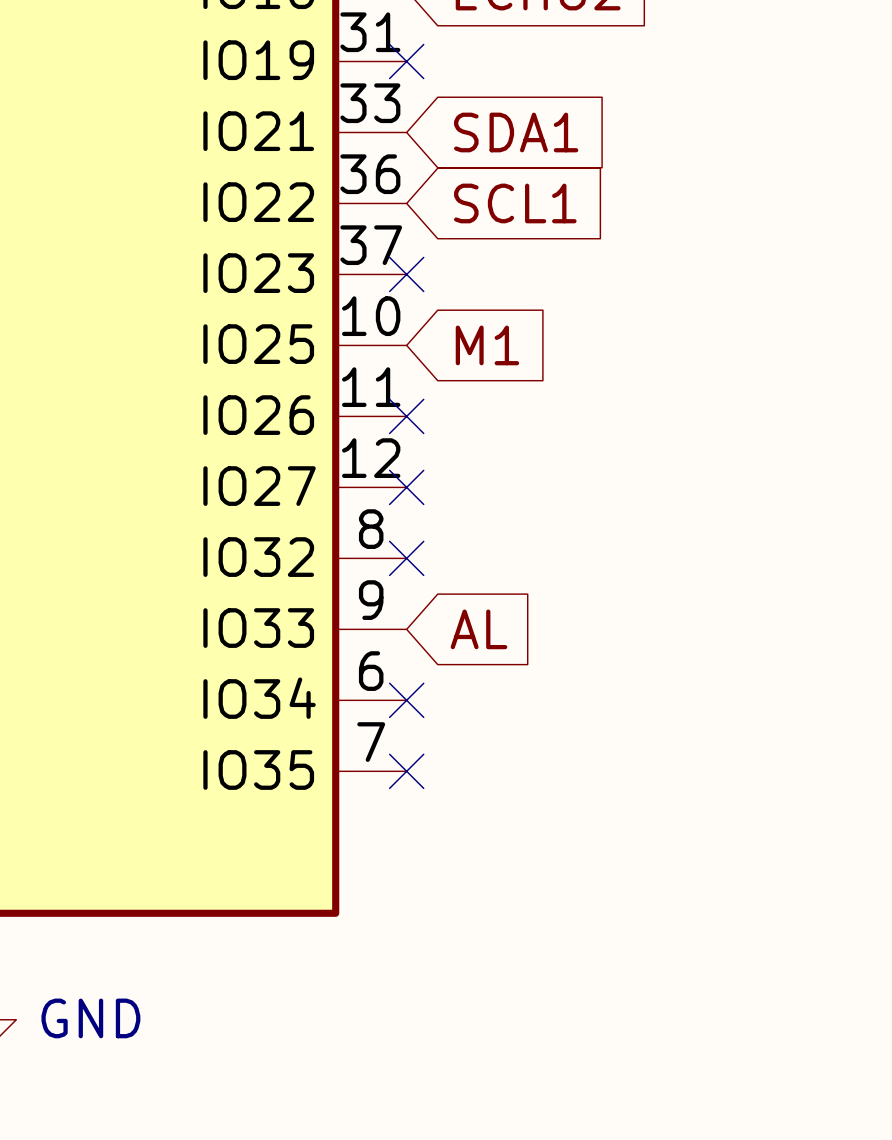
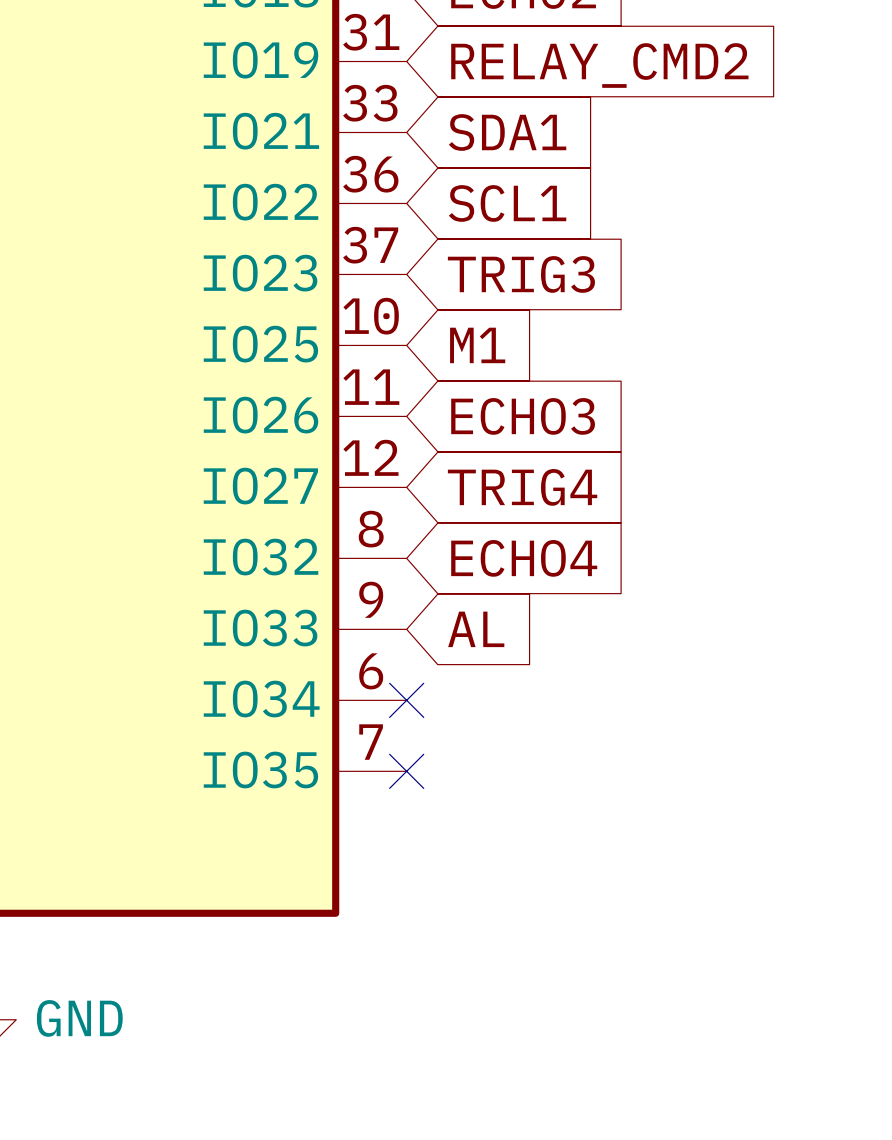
no-connect mark: (406, 61) -> none
global label: none -> RELAY_CMD2 (599, 65)
no-connect mark: (406, 274) -> none
global label: none -> TRIG3 (521, 274)
no-connect mark: (406, 416) -> none
global label: none -> ECHO3 (523, 416)
global label: none -> TRIG4 (522, 487)
no-connect mark: (406, 487) -> none
global label: none -> ECHO4 (524, 558)
no-connect mark: (406, 558) -> none

